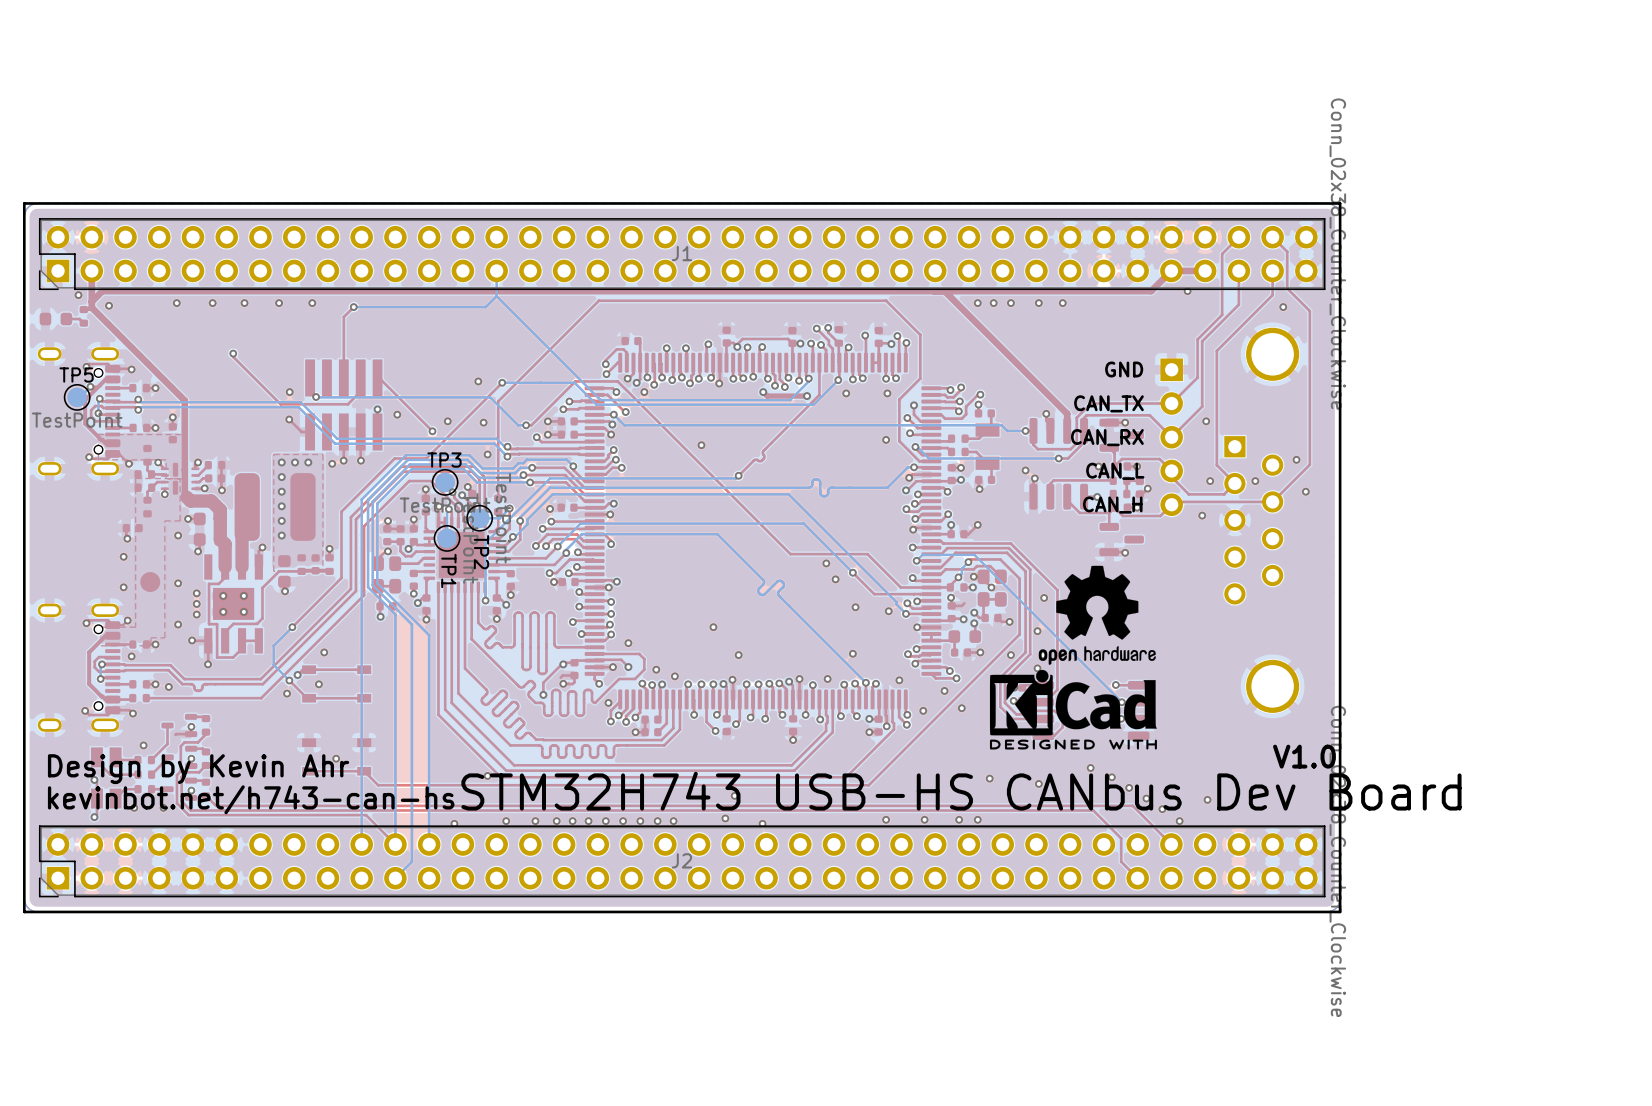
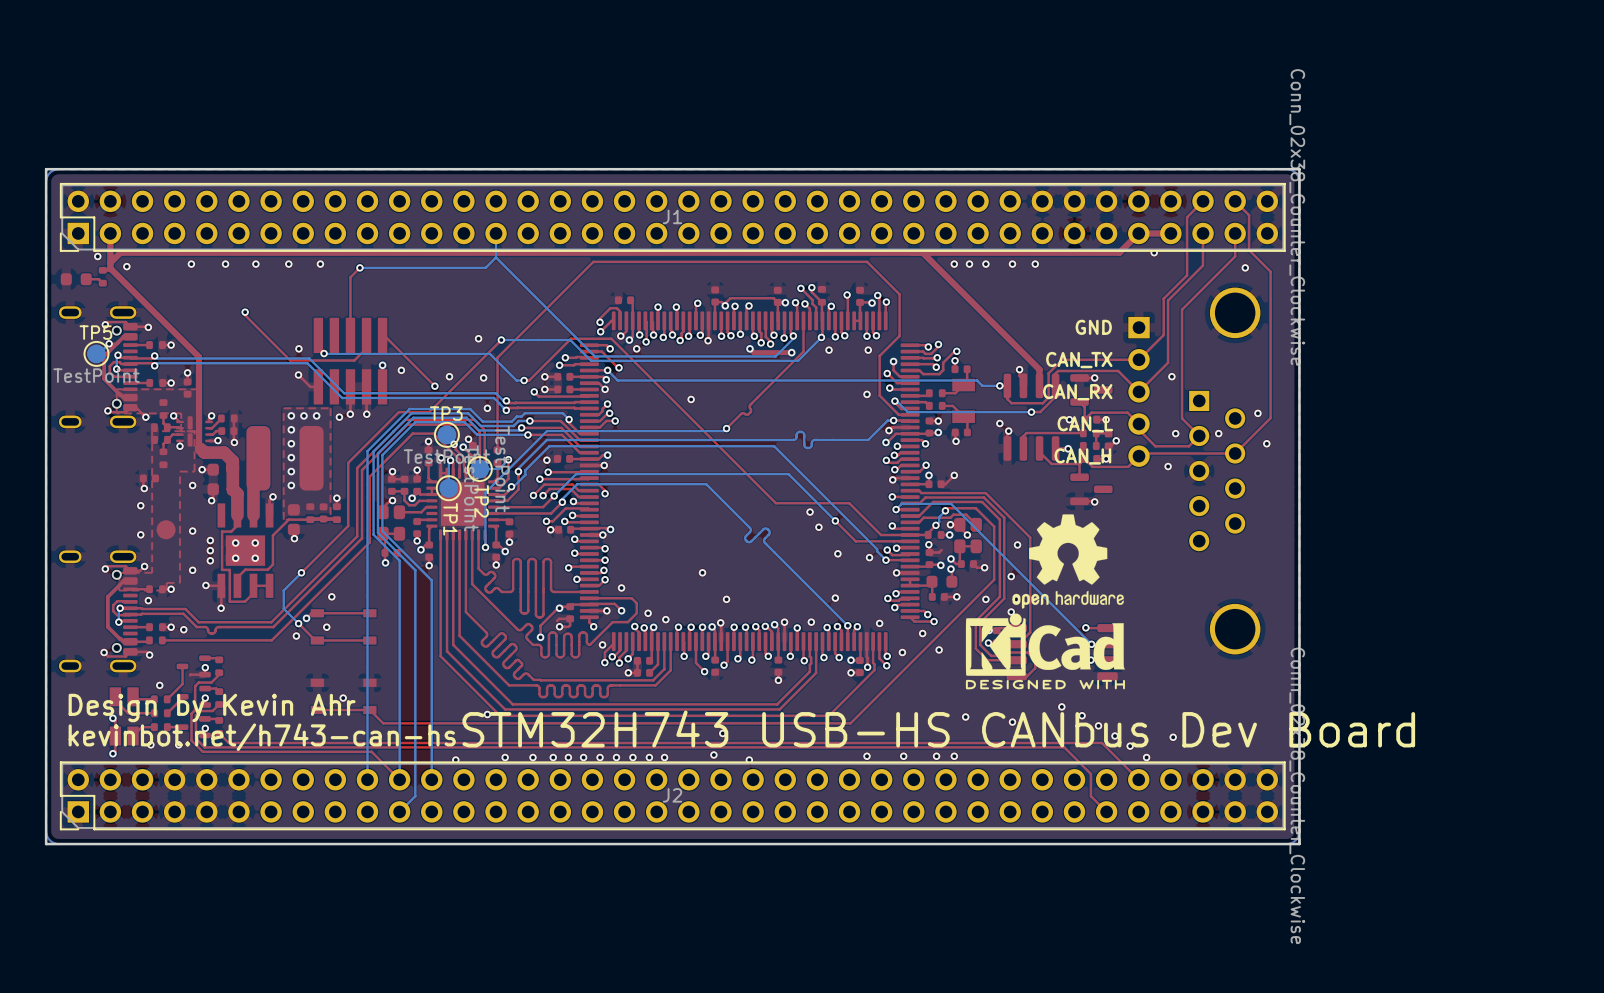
text: V1.0 (1304, 756) -> none

